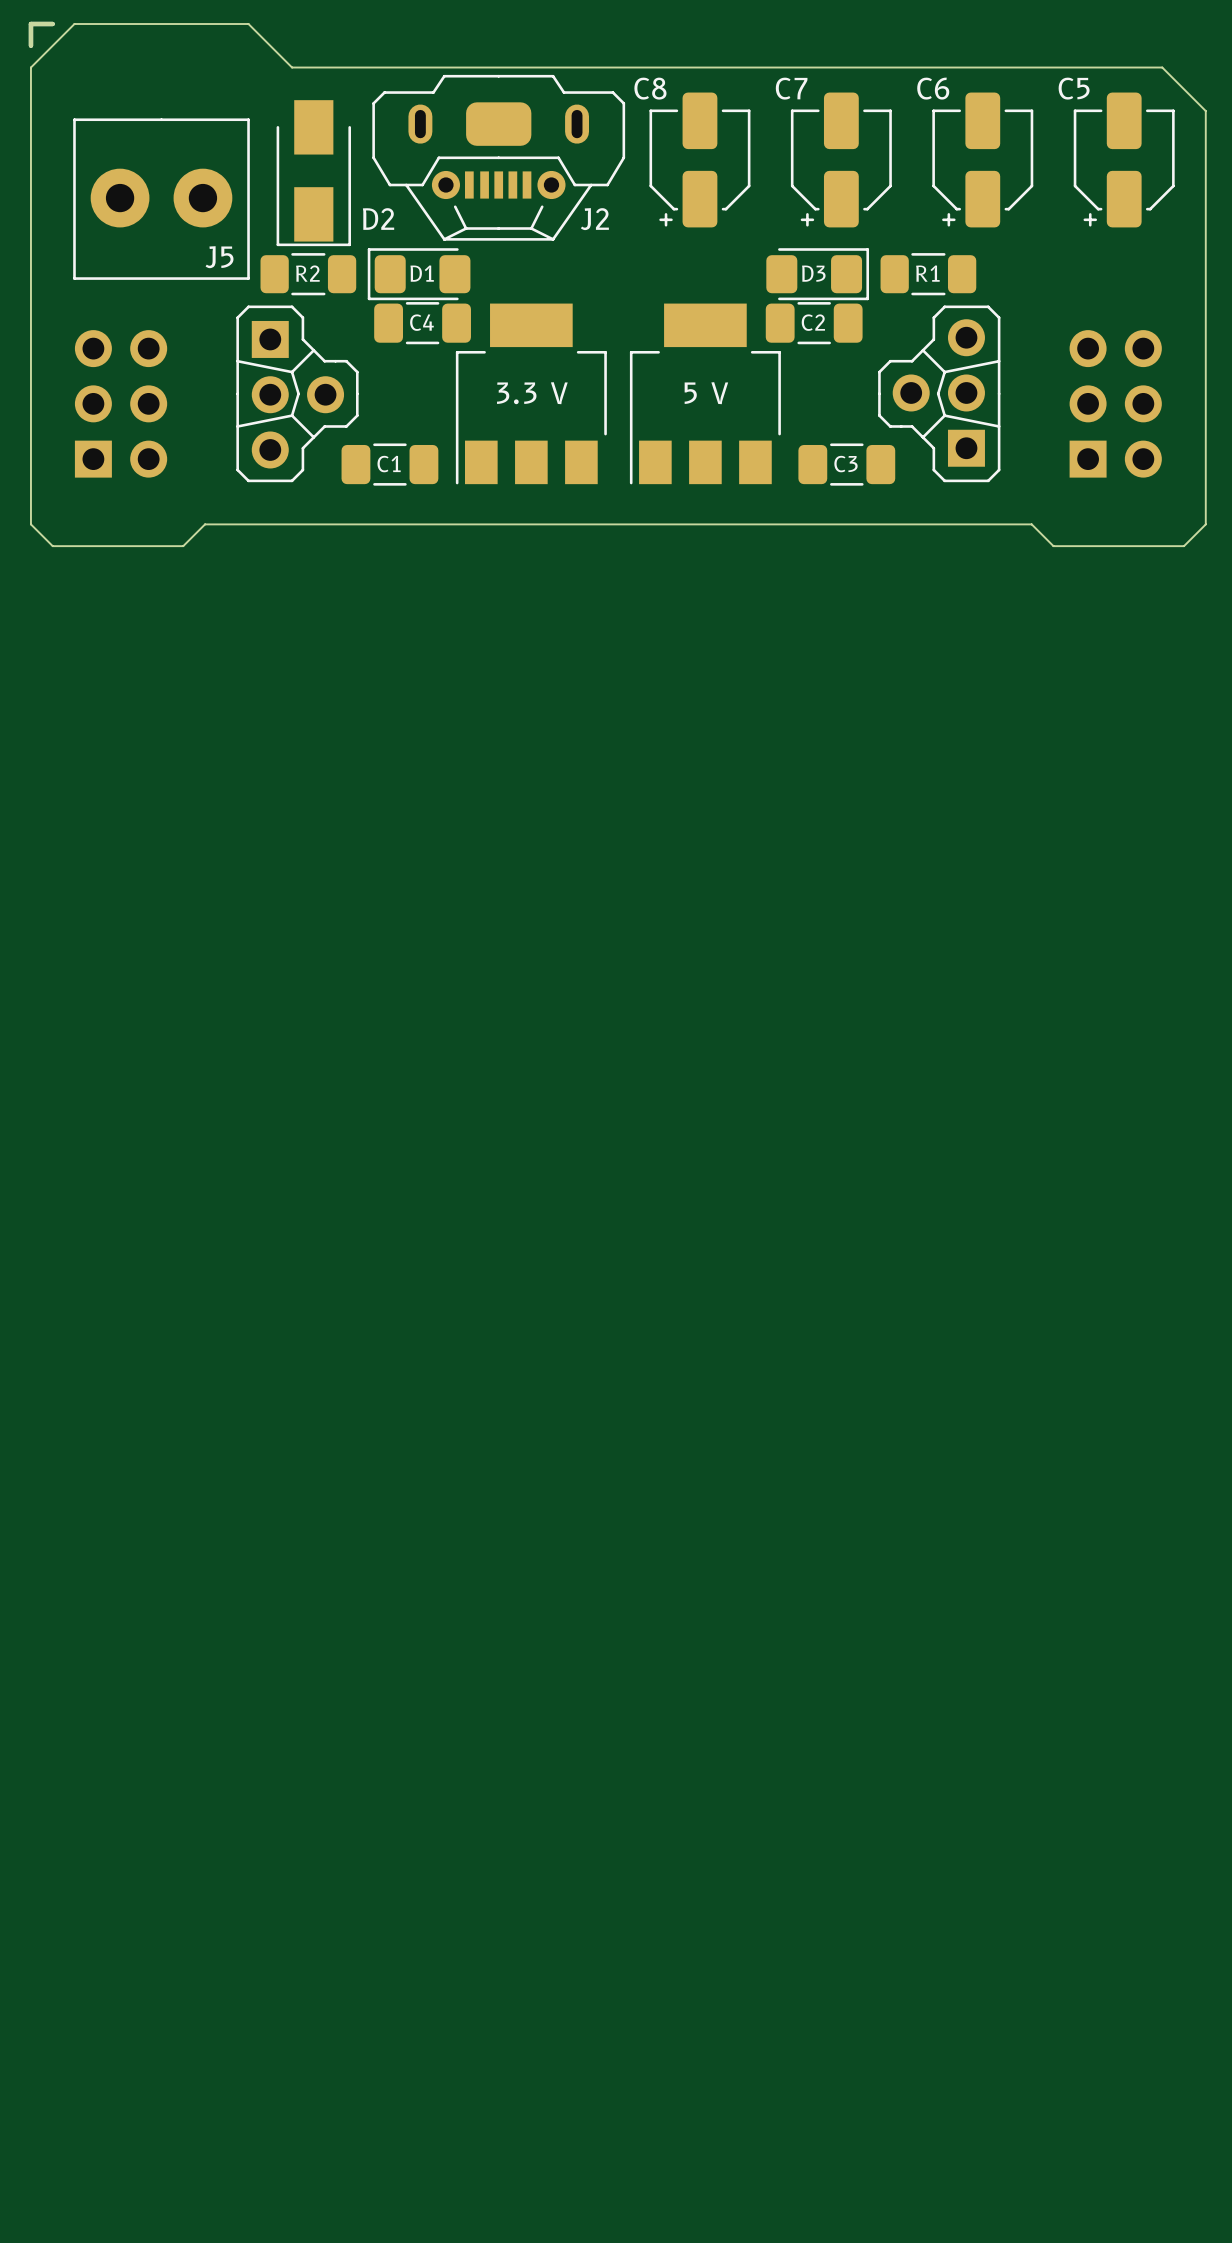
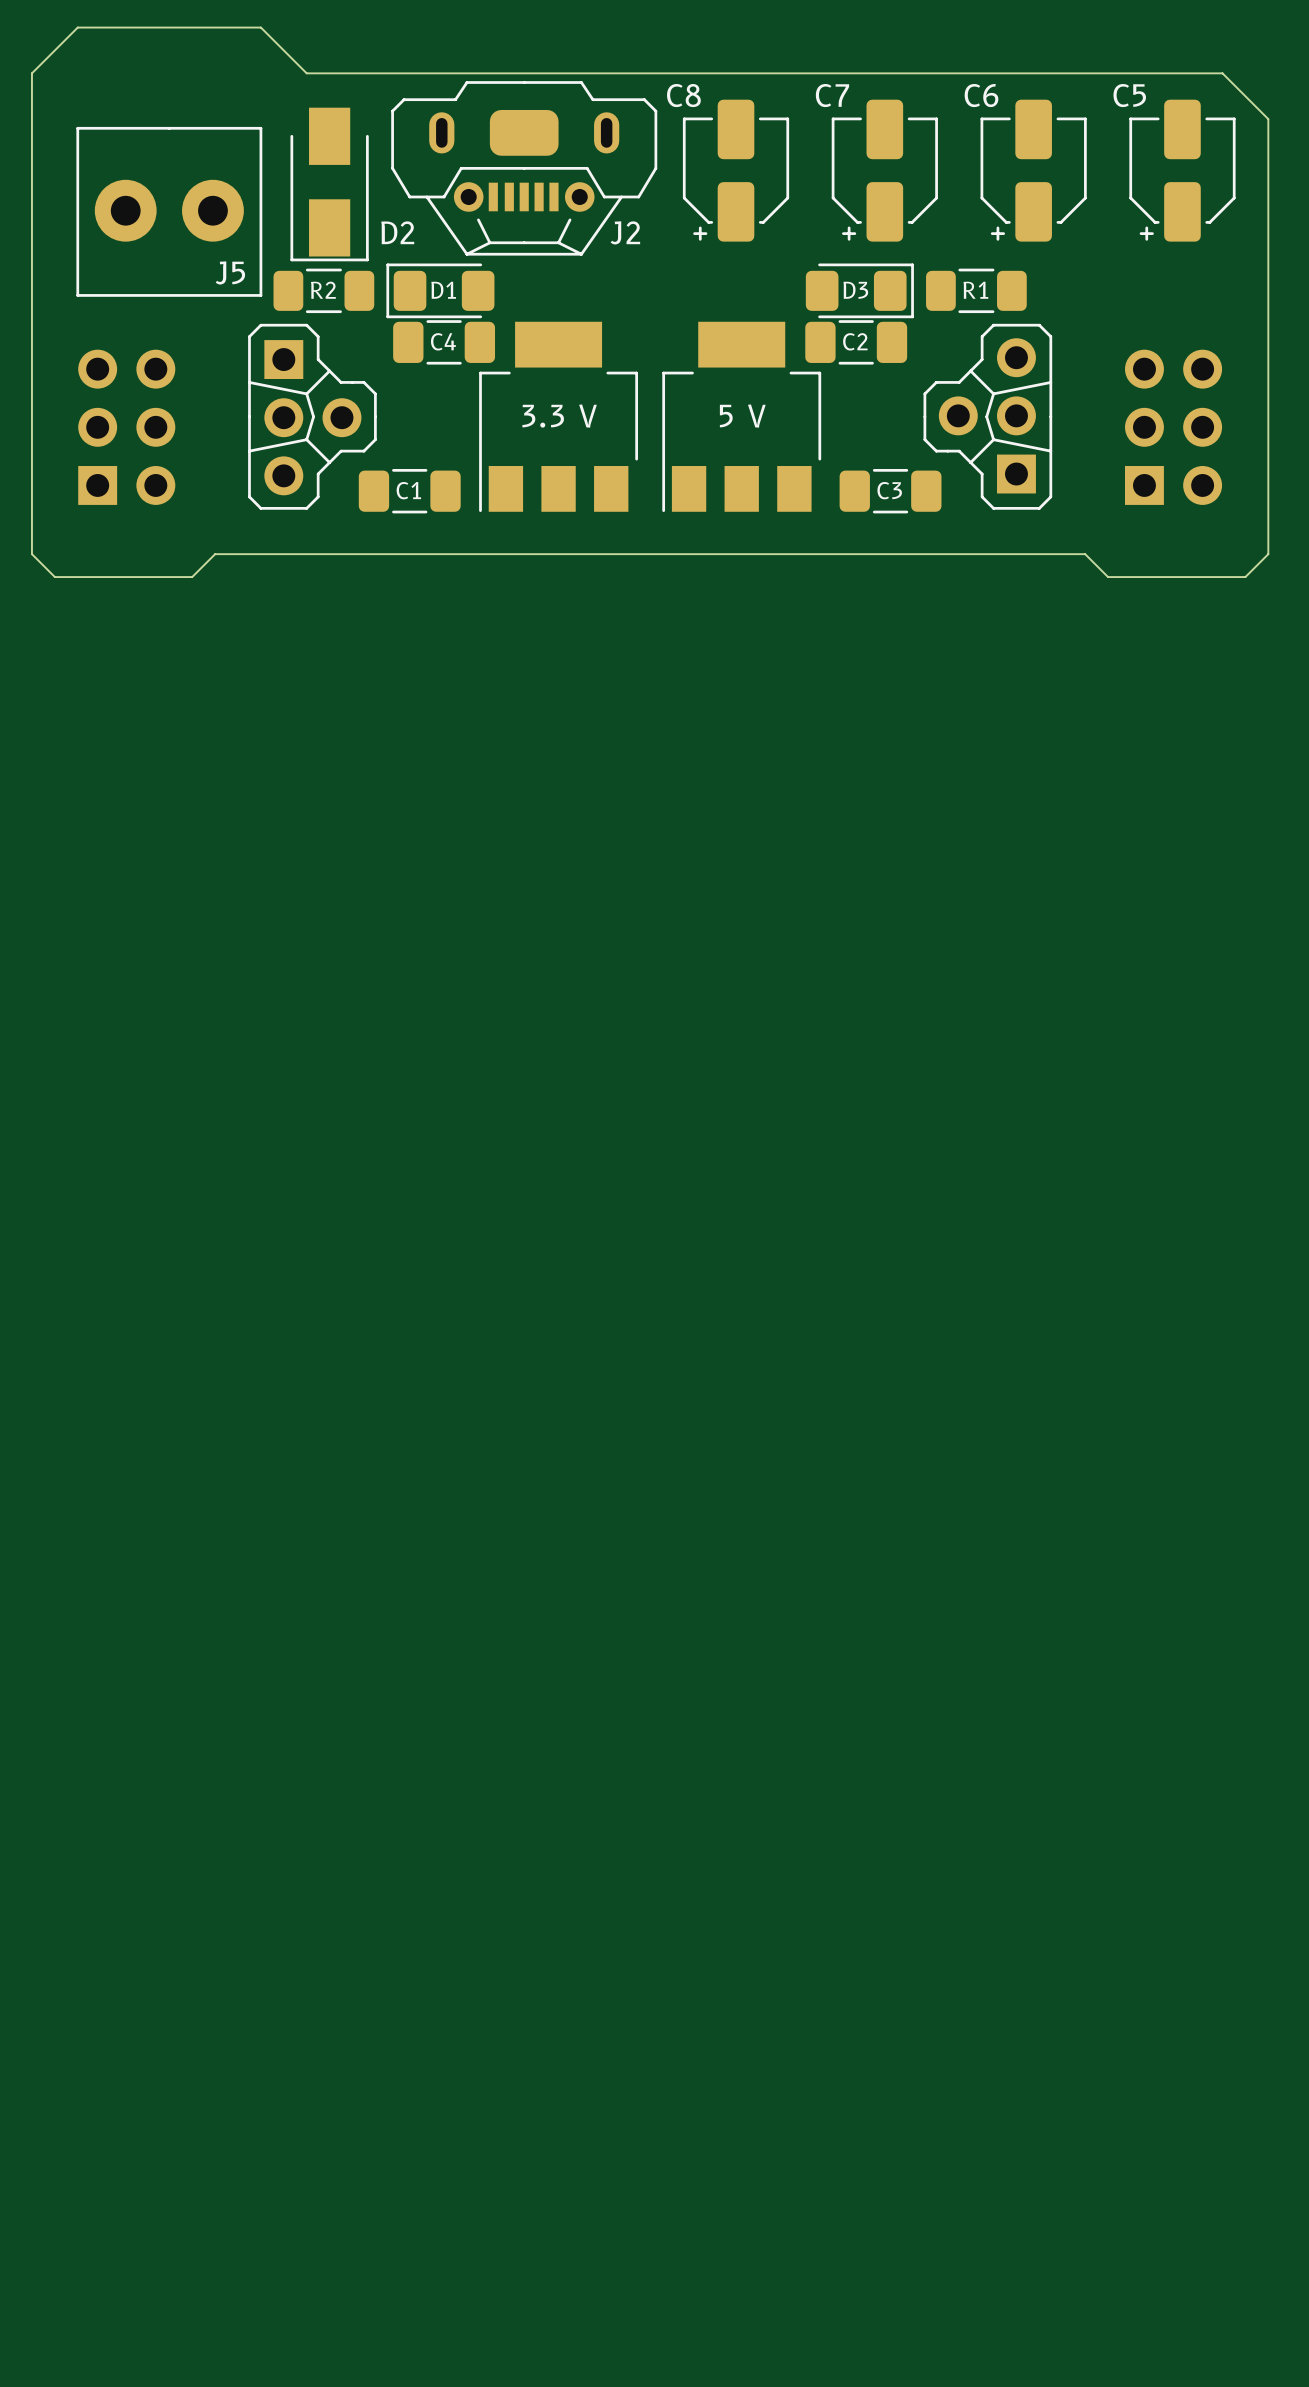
board edge: (52, 24) (30, 24) (30, 45) -> none

